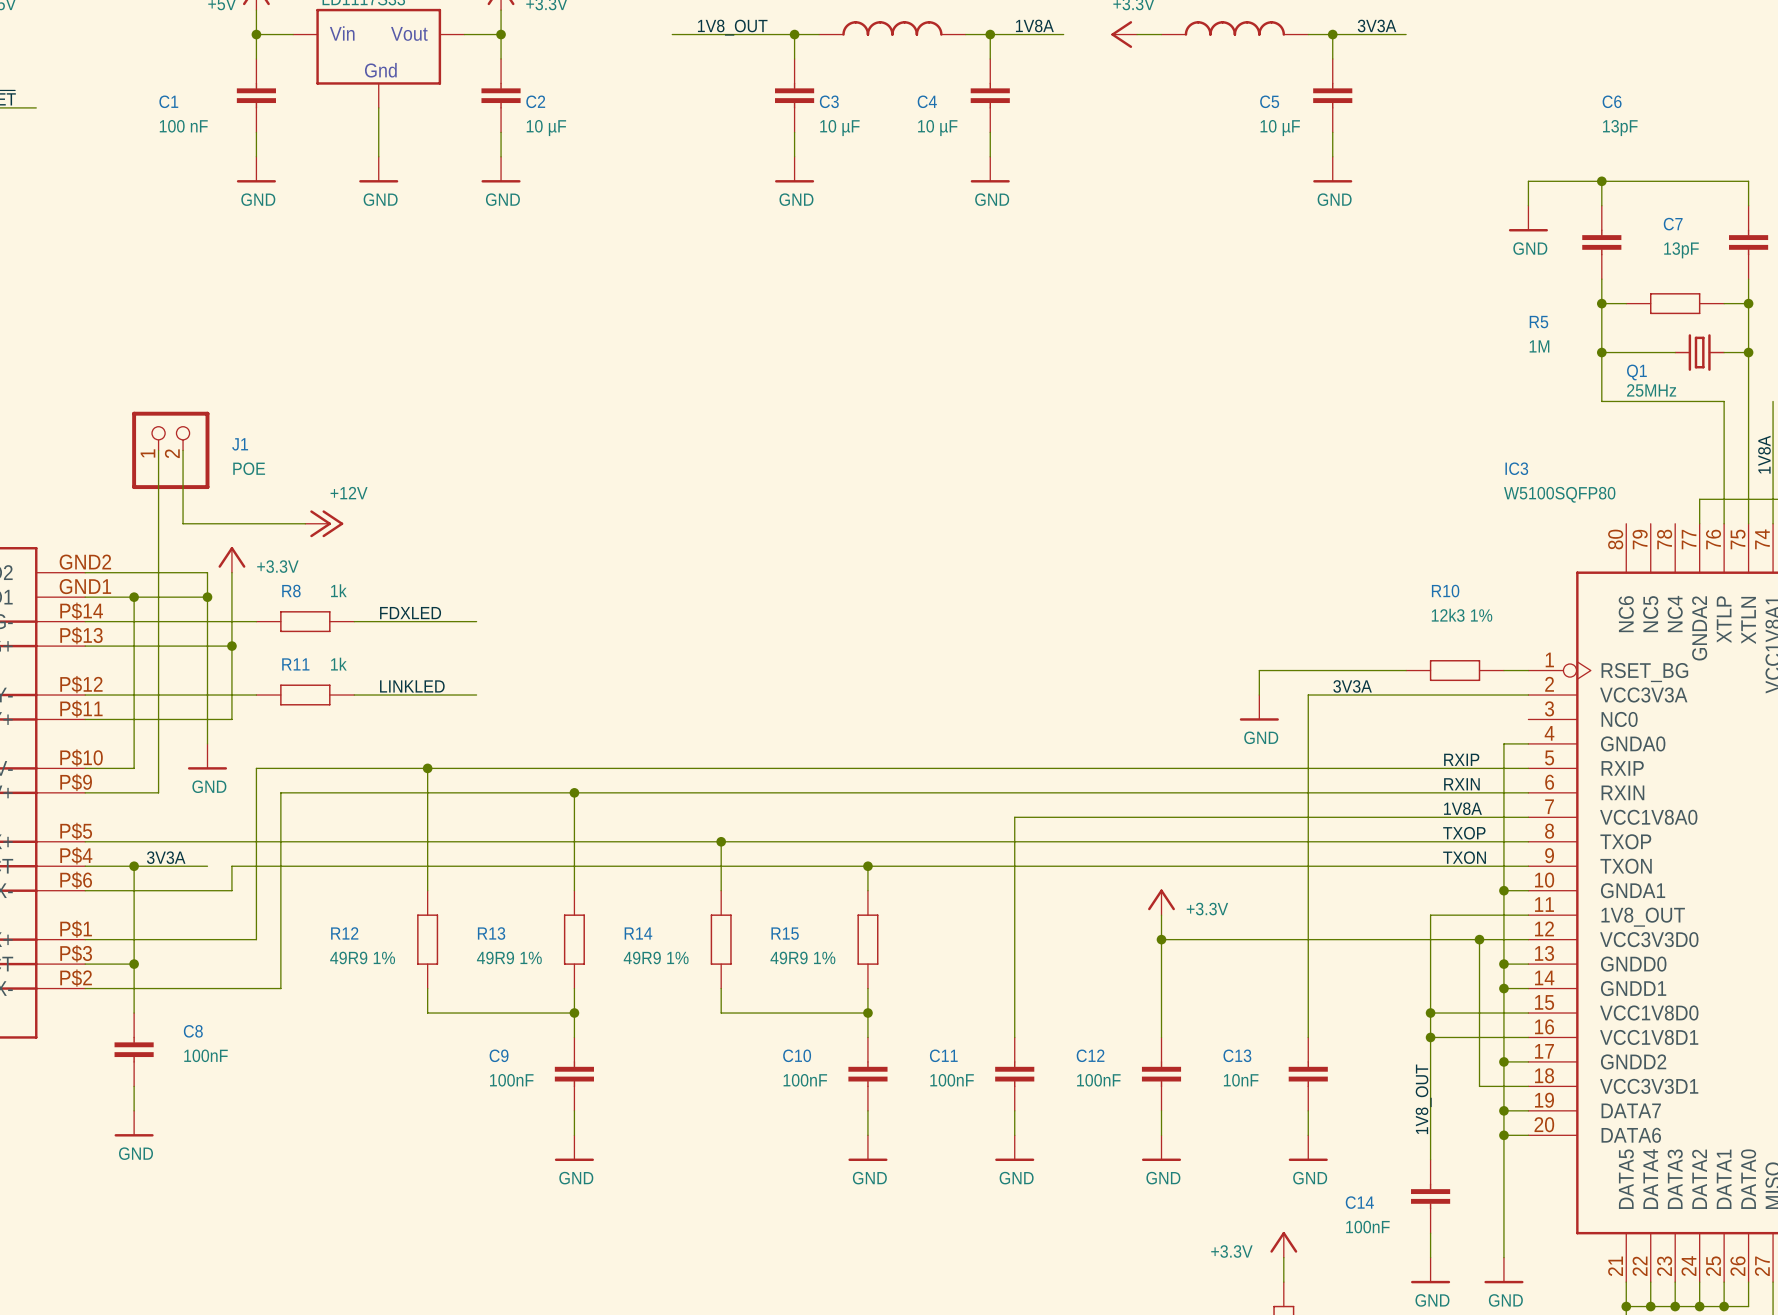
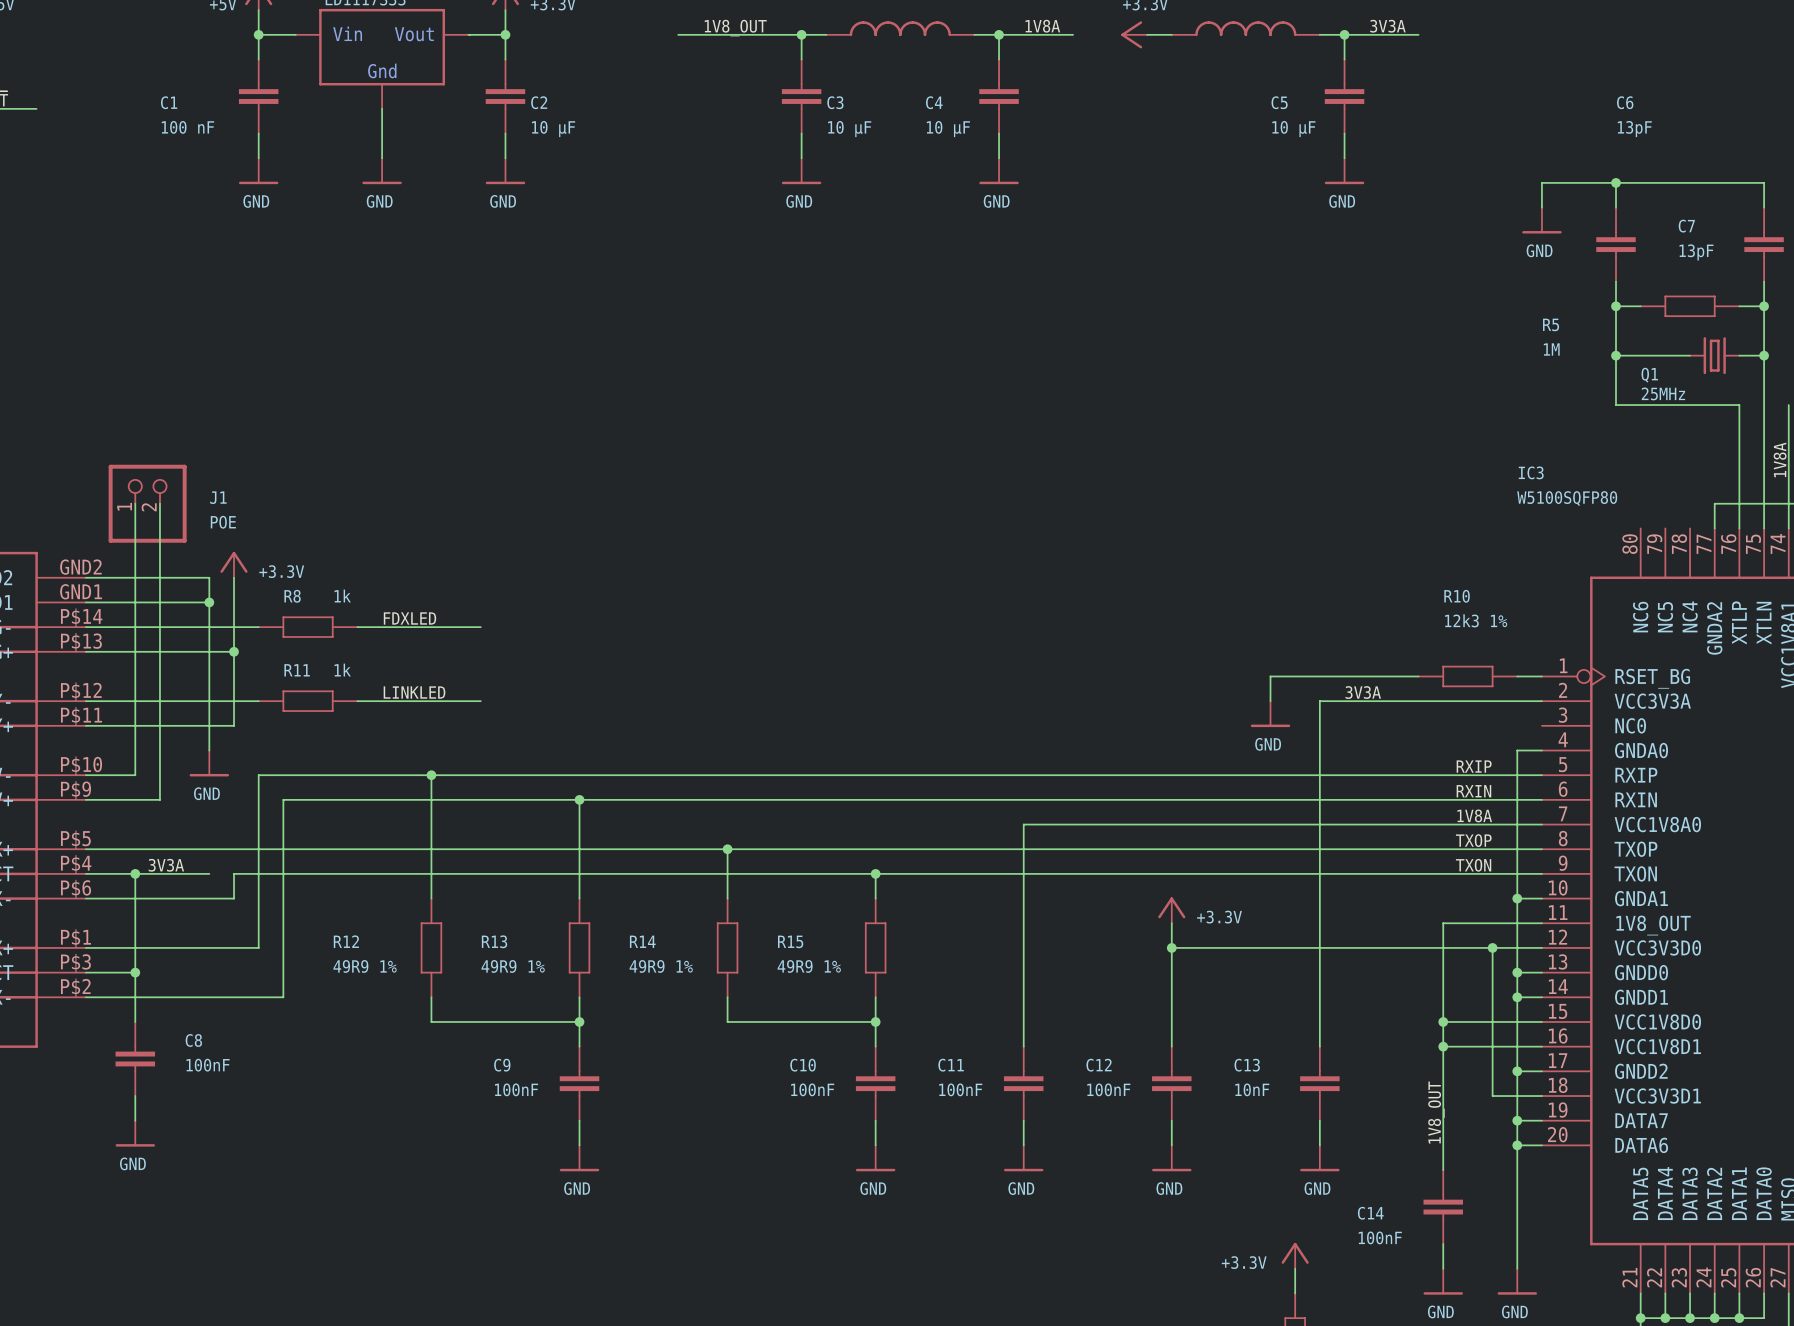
wire: (158, 450) (158, 499) -> none
J1 position: (170, 450) -> (147, 503)
wire: (183, 450) (183, 523) (305, 523) -> none
wire: none -> (135, 503) (135, 602)
power symbol: +12V (324, 523) -> none
junction: (134, 597) -> none

